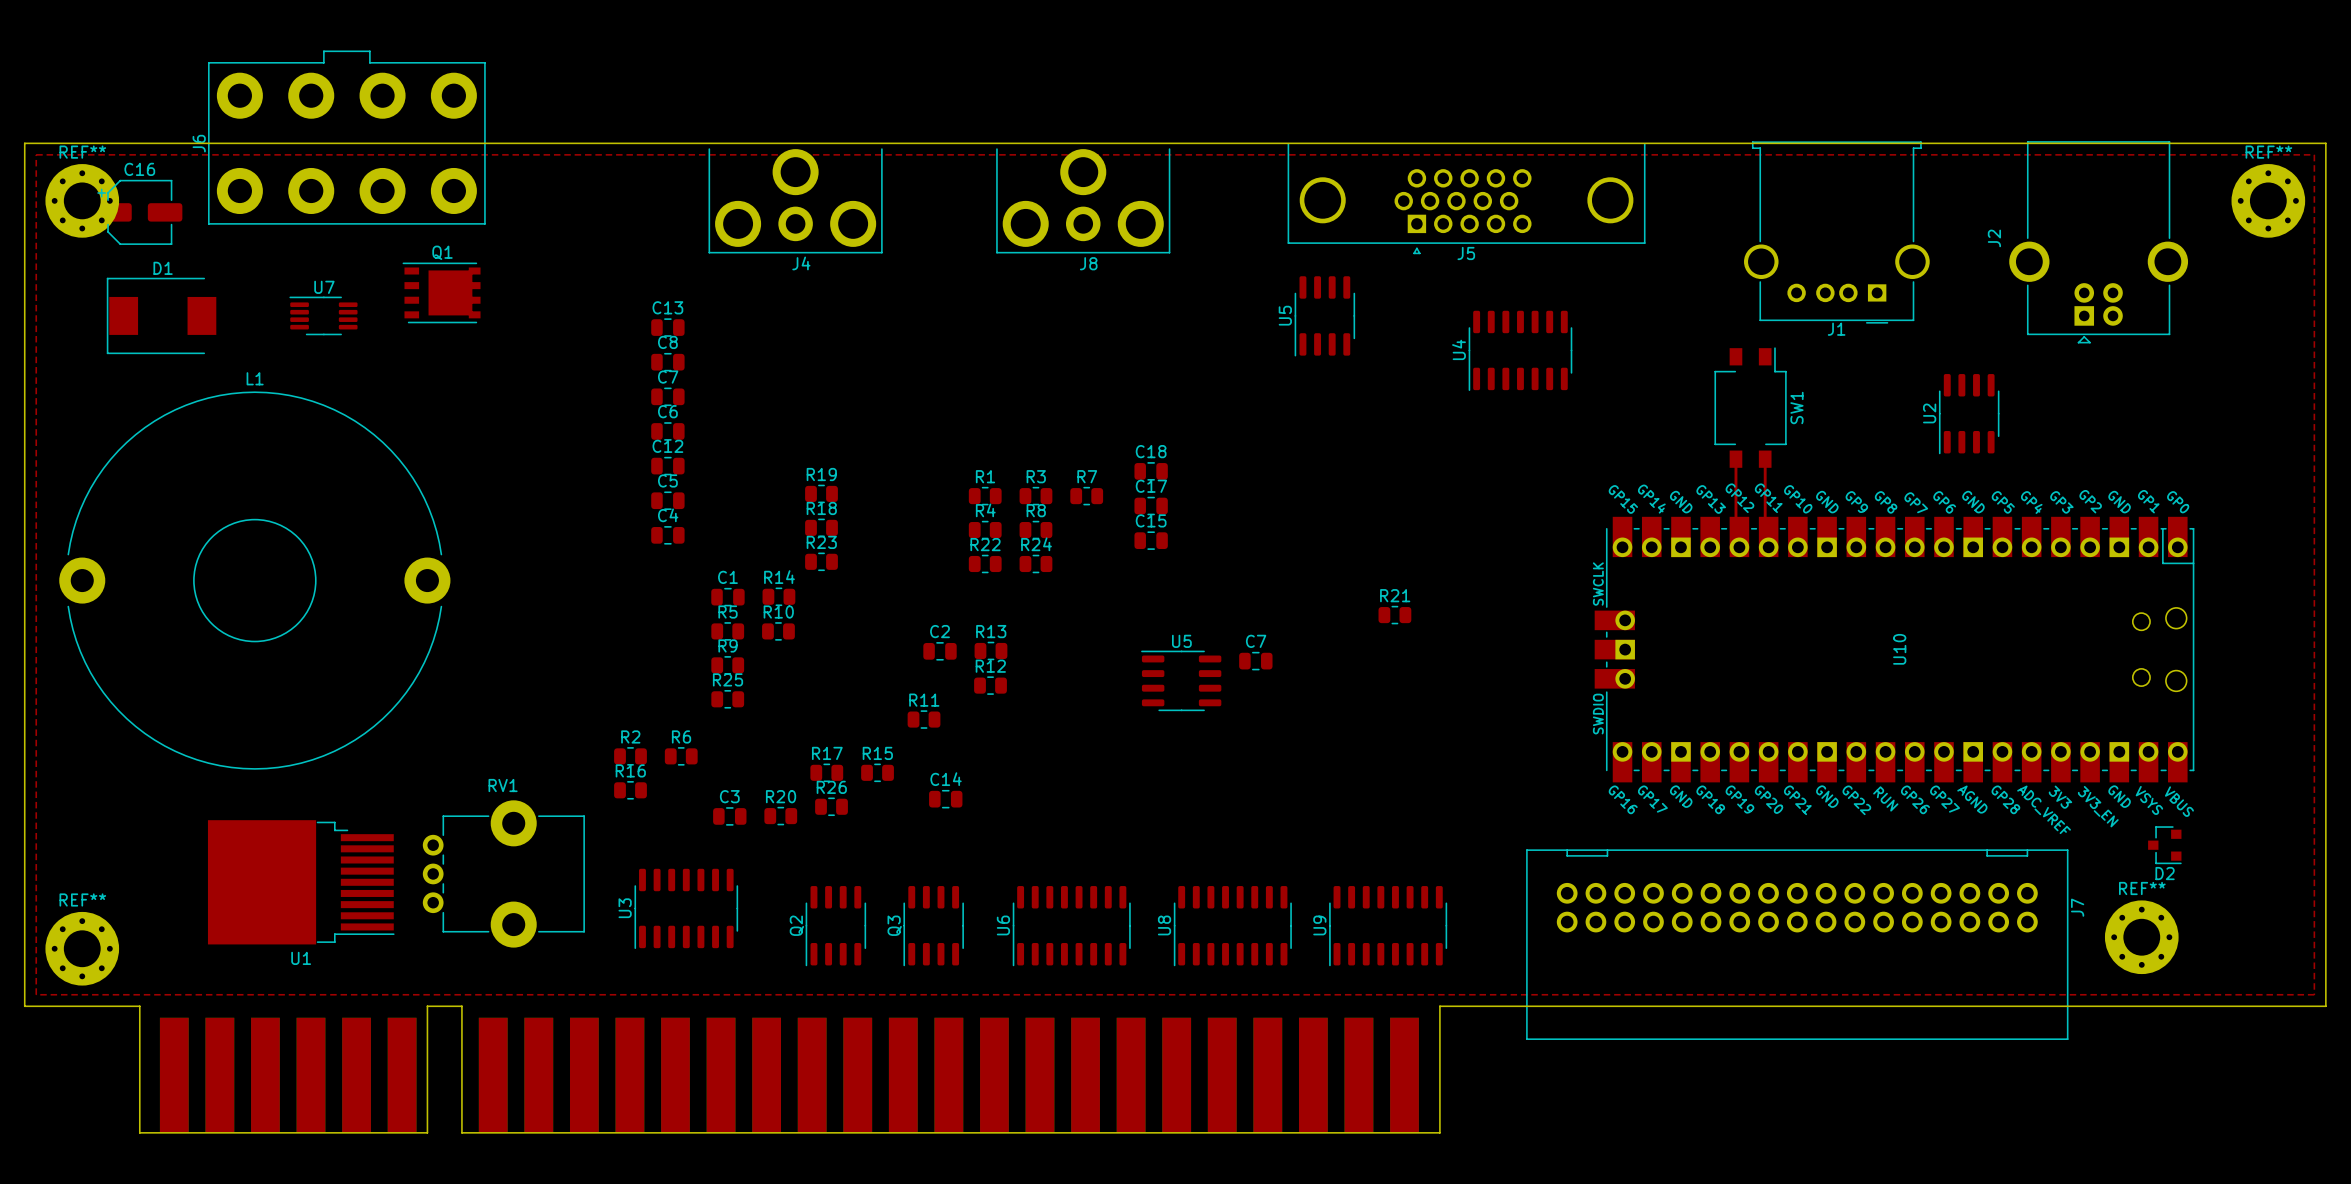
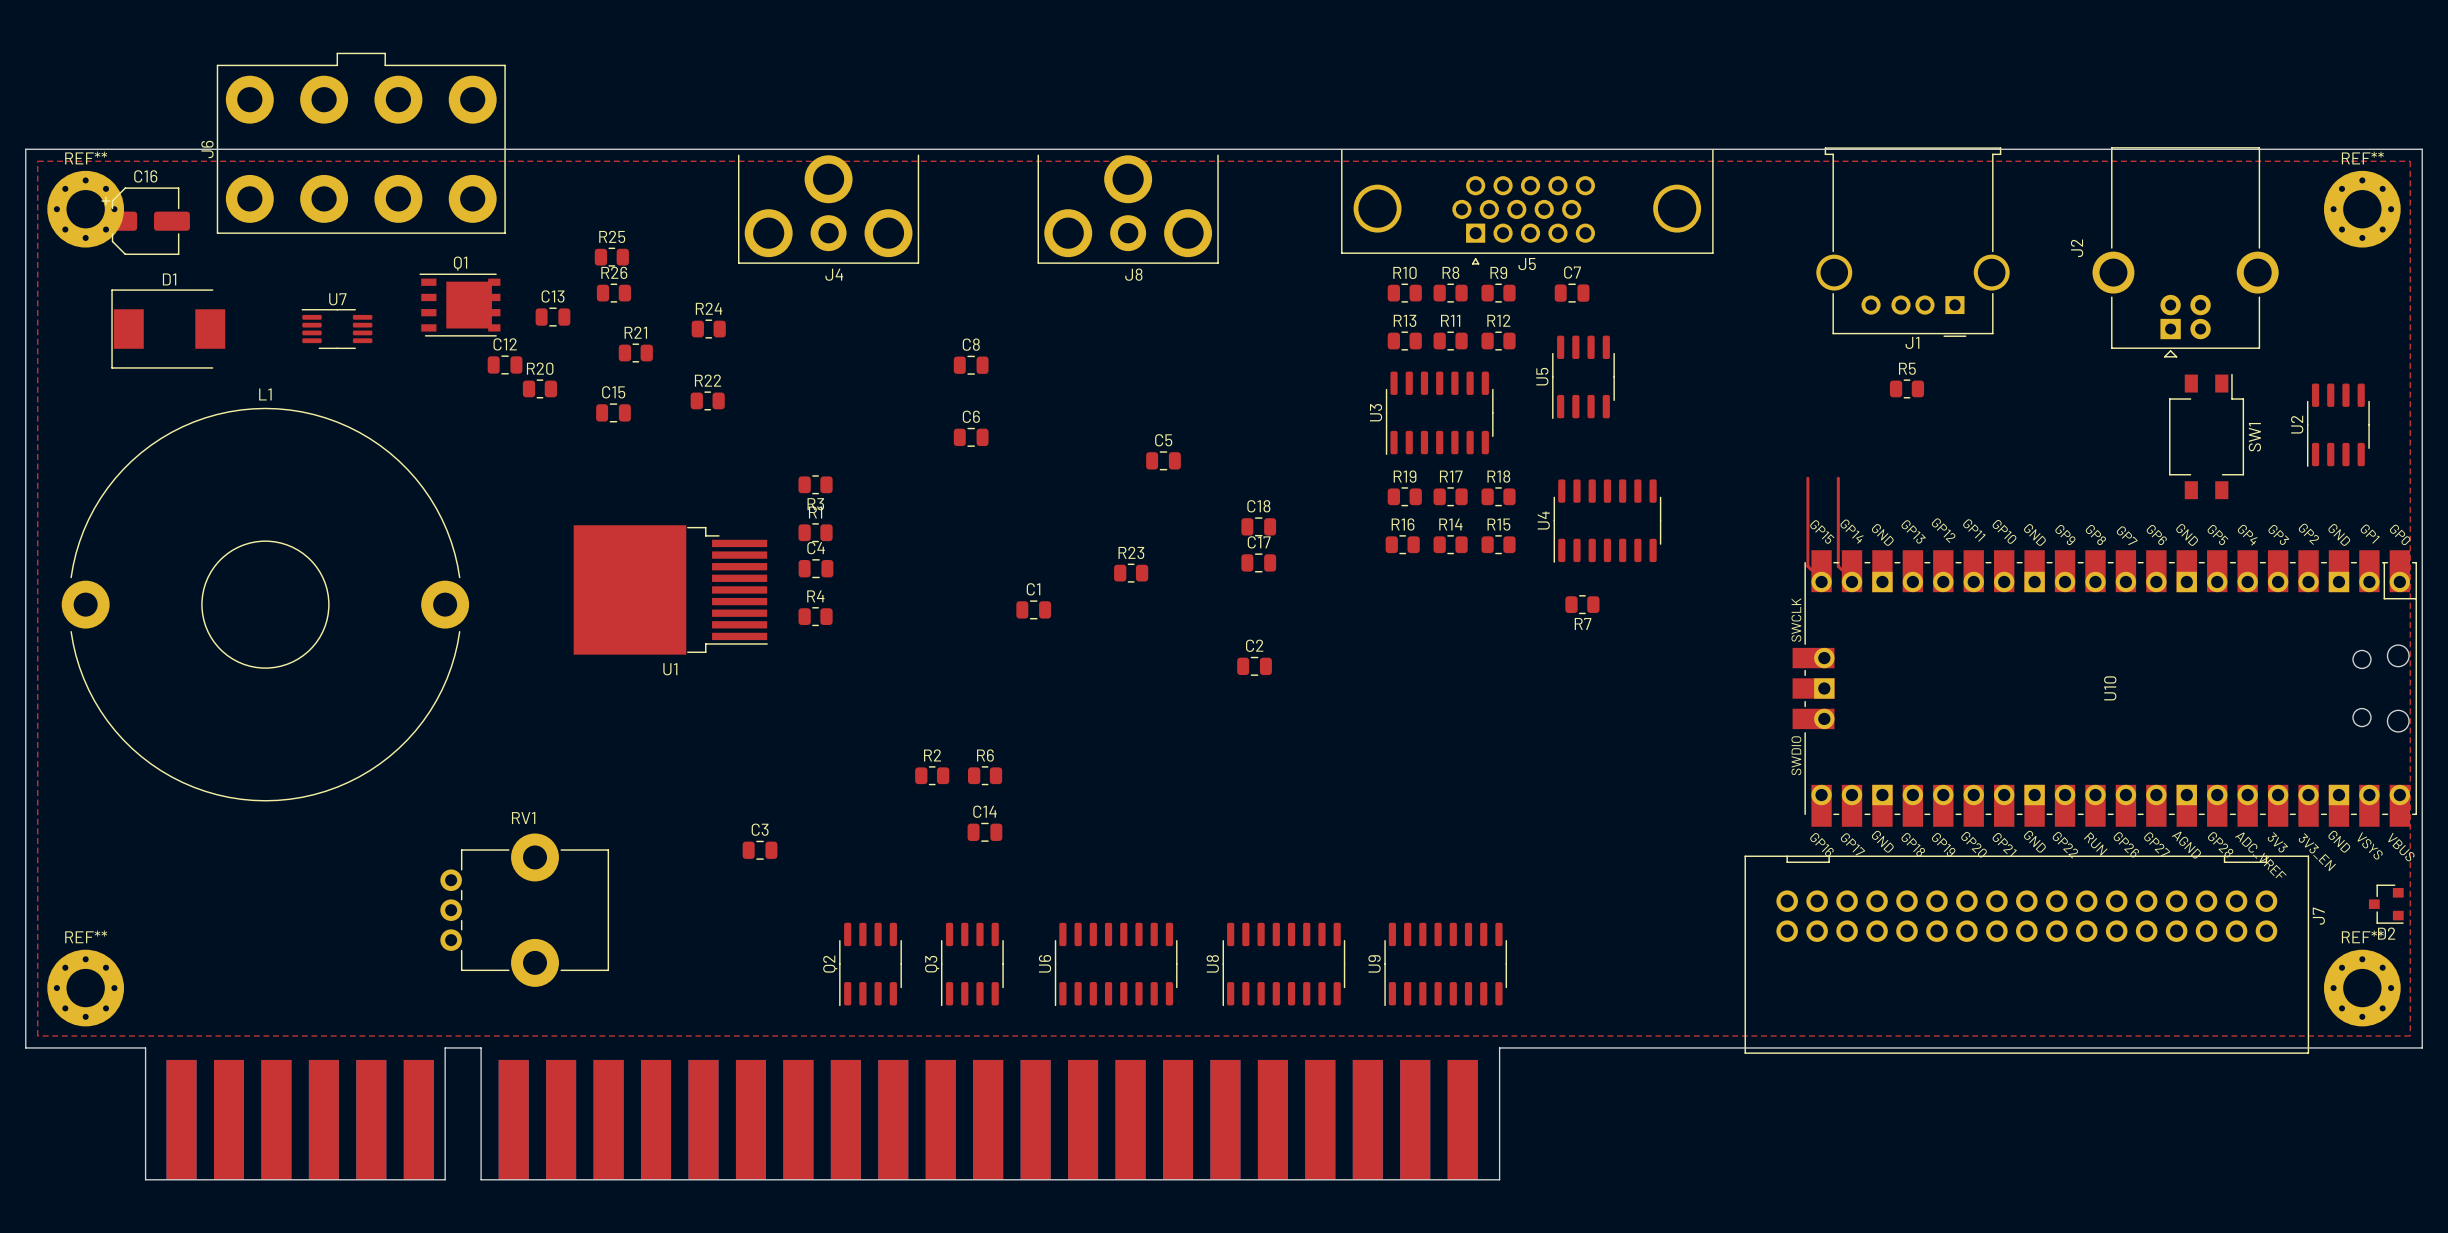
C7: none -> (1572, 293)
U5 position: (1324, 316) -> (1583, 377)
C13 position: (667, 327) -> (552, 317)
U4 position: (1520, 350) -> (1607, 521)
C8 position: (667, 362) -> (971, 365)
C7: (667, 396) -> none
SW1 position: (1750, 407) -> (2206, 436)
U2 position: (1969, 414) -> (2338, 425)
C6 position: (667, 431) -> (971, 437)
C12 position: (667, 466) -> (505, 364)
C18 position: (1151, 471) -> (1258, 526)
R3 name position: R3 (1036, 476) -> R3 (815, 504)
R7 name position: R7 (1087, 476) -> R7 (1583, 623)
R19 position: (821, 493) -> (1404, 496)
R1 position: (985, 496) -> (815, 532)
R3 position: (1035, 496) -> (815, 484)
R7 position: (1086, 496) -> (1582, 604)
C5 position: (667, 500) -> (1163, 460)
C17 position: (1151, 506) -> (1258, 562)
R18 position: (821, 527) -> (1498, 496)
R4 position: (985, 530) -> (815, 616)
R8 position: (1035, 530) -> (1450, 293)
C4 position: (667, 535) -> (816, 568)
C15 position: (1151, 540) -> (613, 412)
R23 position: (821, 561) -> (1131, 573)
R22 position: (985, 564) -> (707, 400)
R24 position: (1035, 564) -> (708, 329)
R14 position: (778, 596) -> (1450, 544)
C1 position: (727, 597) -> (1033, 609)
R21 position: (1394, 615) -> (635, 352)
R5 position: (727, 631) -> (1907, 388)
R10 position: (778, 631) -> (1404, 293)
U10 position: (1894, 649) -> (2104, 688)
R13 position: (990, 650) -> (1404, 341)
C2 position: (940, 651) -> (1254, 666)
C7: (1255, 661) -> none
R9 position: (727, 665) -> (1498, 293)
U5: (1181, 680) -> none
R12 position: (990, 685) -> (1498, 341)
R25 position: (727, 699) -> (611, 257)
R11 position: (924, 719) -> (1450, 341)
R2 position: (630, 756) -> (932, 775)
R6 position: (681, 756) -> (985, 775)
R17 position: (826, 772) -> (1450, 496)
R15 position: (877, 772) -> (1498, 544)
R16 position: (630, 790) -> (1402, 544)
R26 position: (831, 806) -> (613, 293)
R20 position: (780, 816) -> (539, 388)
D2 position: (2164, 845) -> (2386, 904)
U1 position: (301, 882) -> (670, 589)
U3 position: (686, 908) -> (1439, 413)
REF** position: (2141, 937) -> (2362, 988)
J7 position: (1797, 944) -> (2026, 954)

